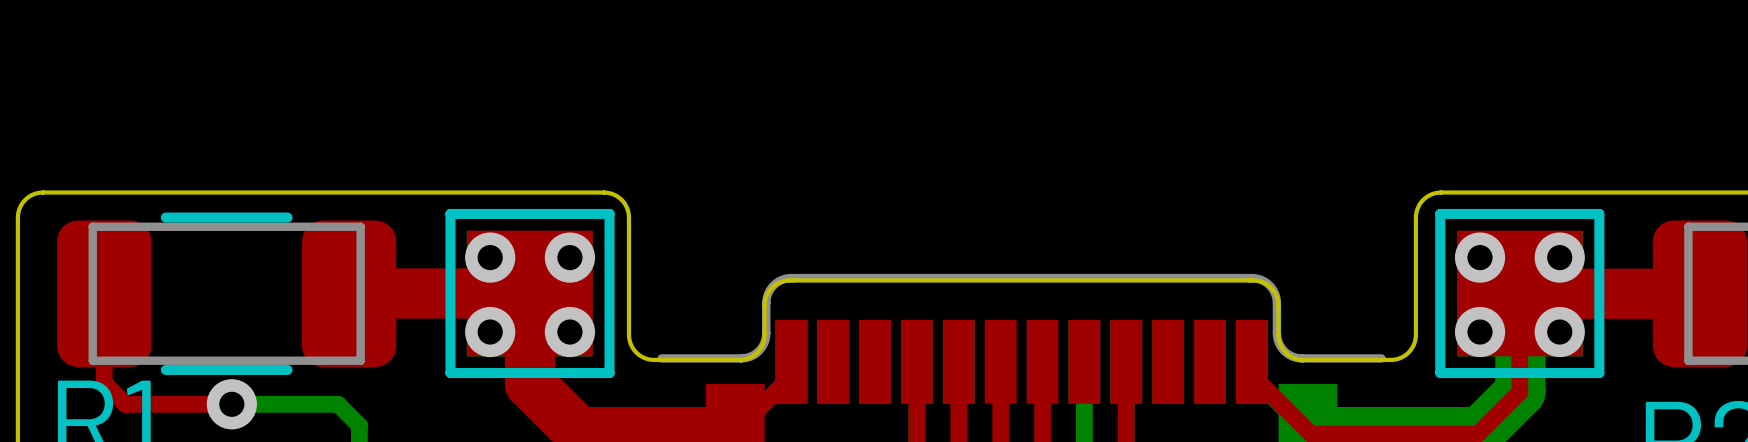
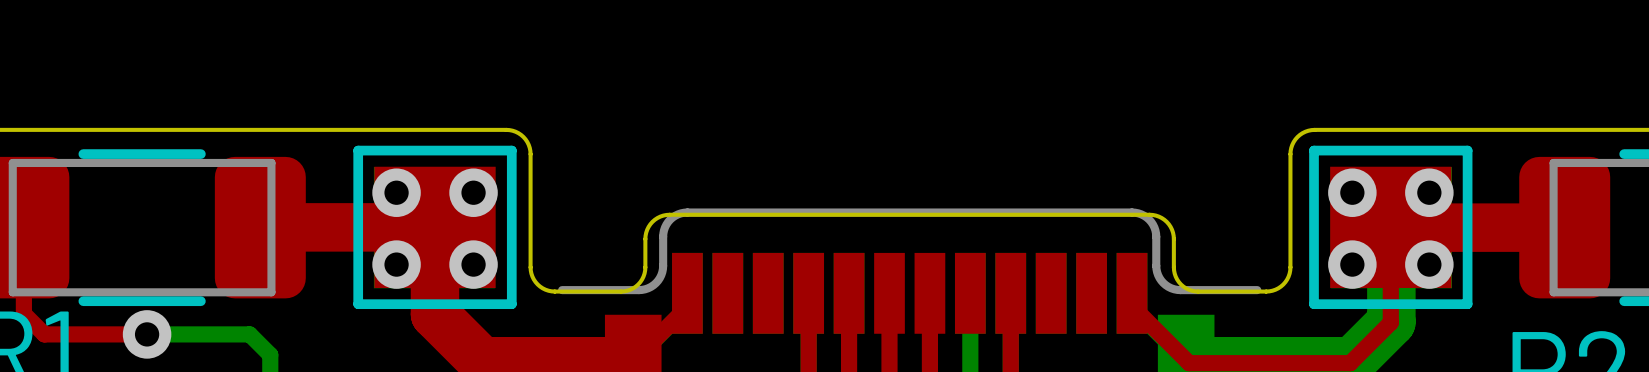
board edge: (789, 280) (777, 283) (766, 295) (764, 338) (759, 350) (745, 359) (722, 359) -> (685, 214) (663, 215) (650, 224) (645, 235) (643, 276) (633, 288) (621, 291)
board edge: (1253, 280) (1268, 285) (1276, 295) (1278, 338) (1283, 350) (1297, 359) (1320, 359) -> (1133, 214) (1155, 215) (1168, 224) (1173, 235) (1175, 276) (1183, 286) (1198, 291)

